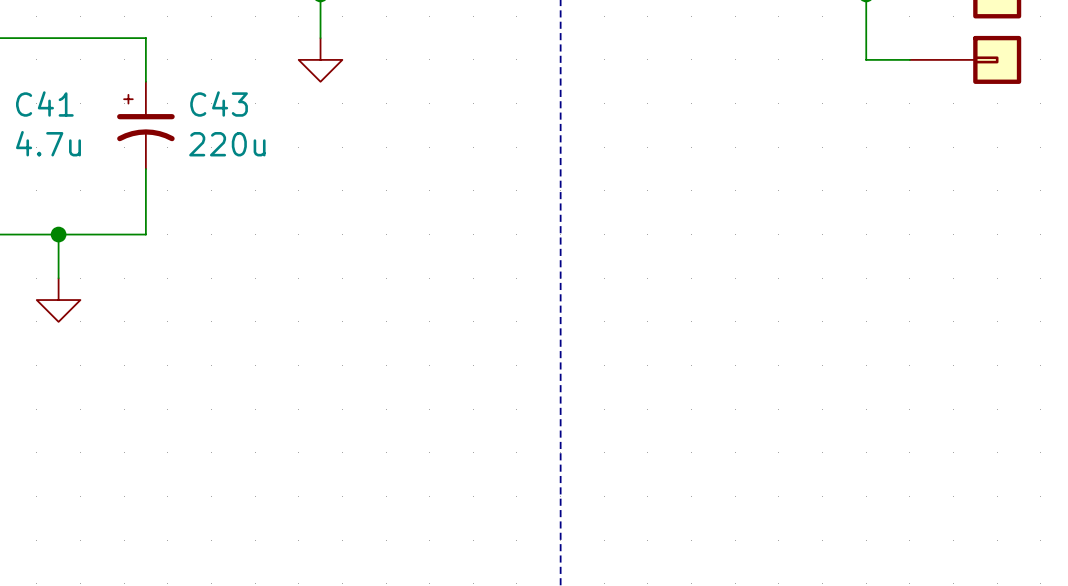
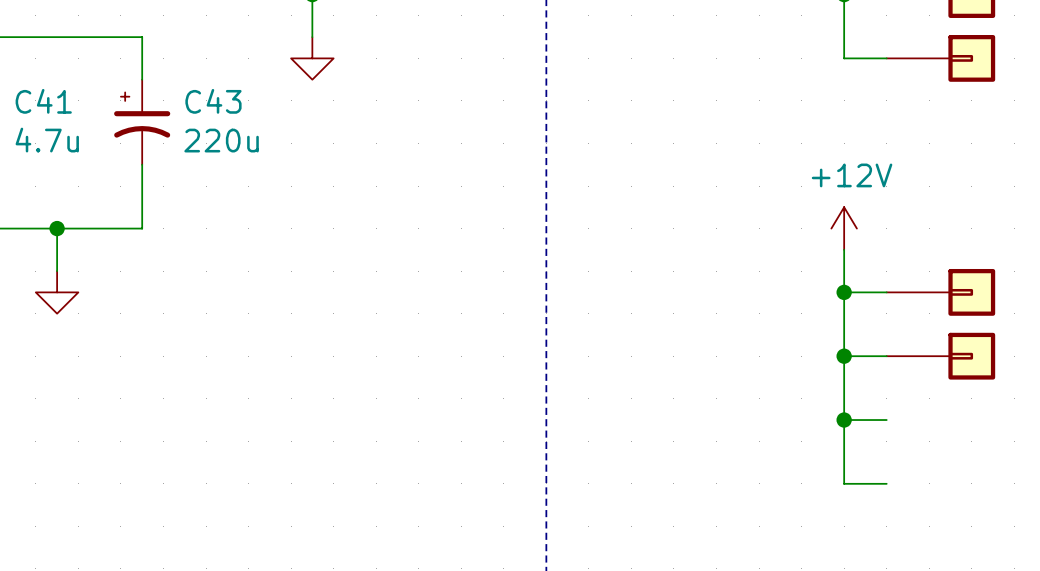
power symbol: none -> +12V (844, 228)
wire: none -> (844, 249) (844, 483) (886, 483)
wire: none -> (844, 292) (886, 292)
junction: none -> (844, 292)
part: none -> (940, 292)
wire: none -> (844, 356) (886, 356)
junction: none -> (844, 356)
part: none -> (940, 356)
wire: none -> (844, 420) (886, 420)
junction: none -> (844, 420)

